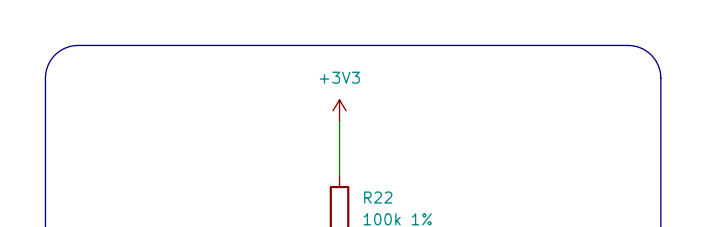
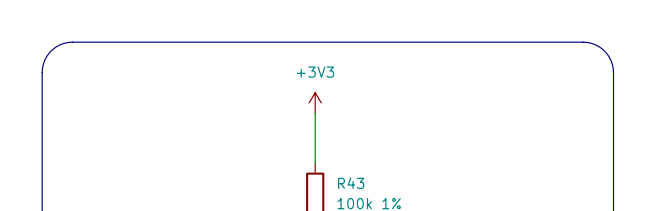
R22 name: R22 (378, 197) -> R43 (351, 183)

